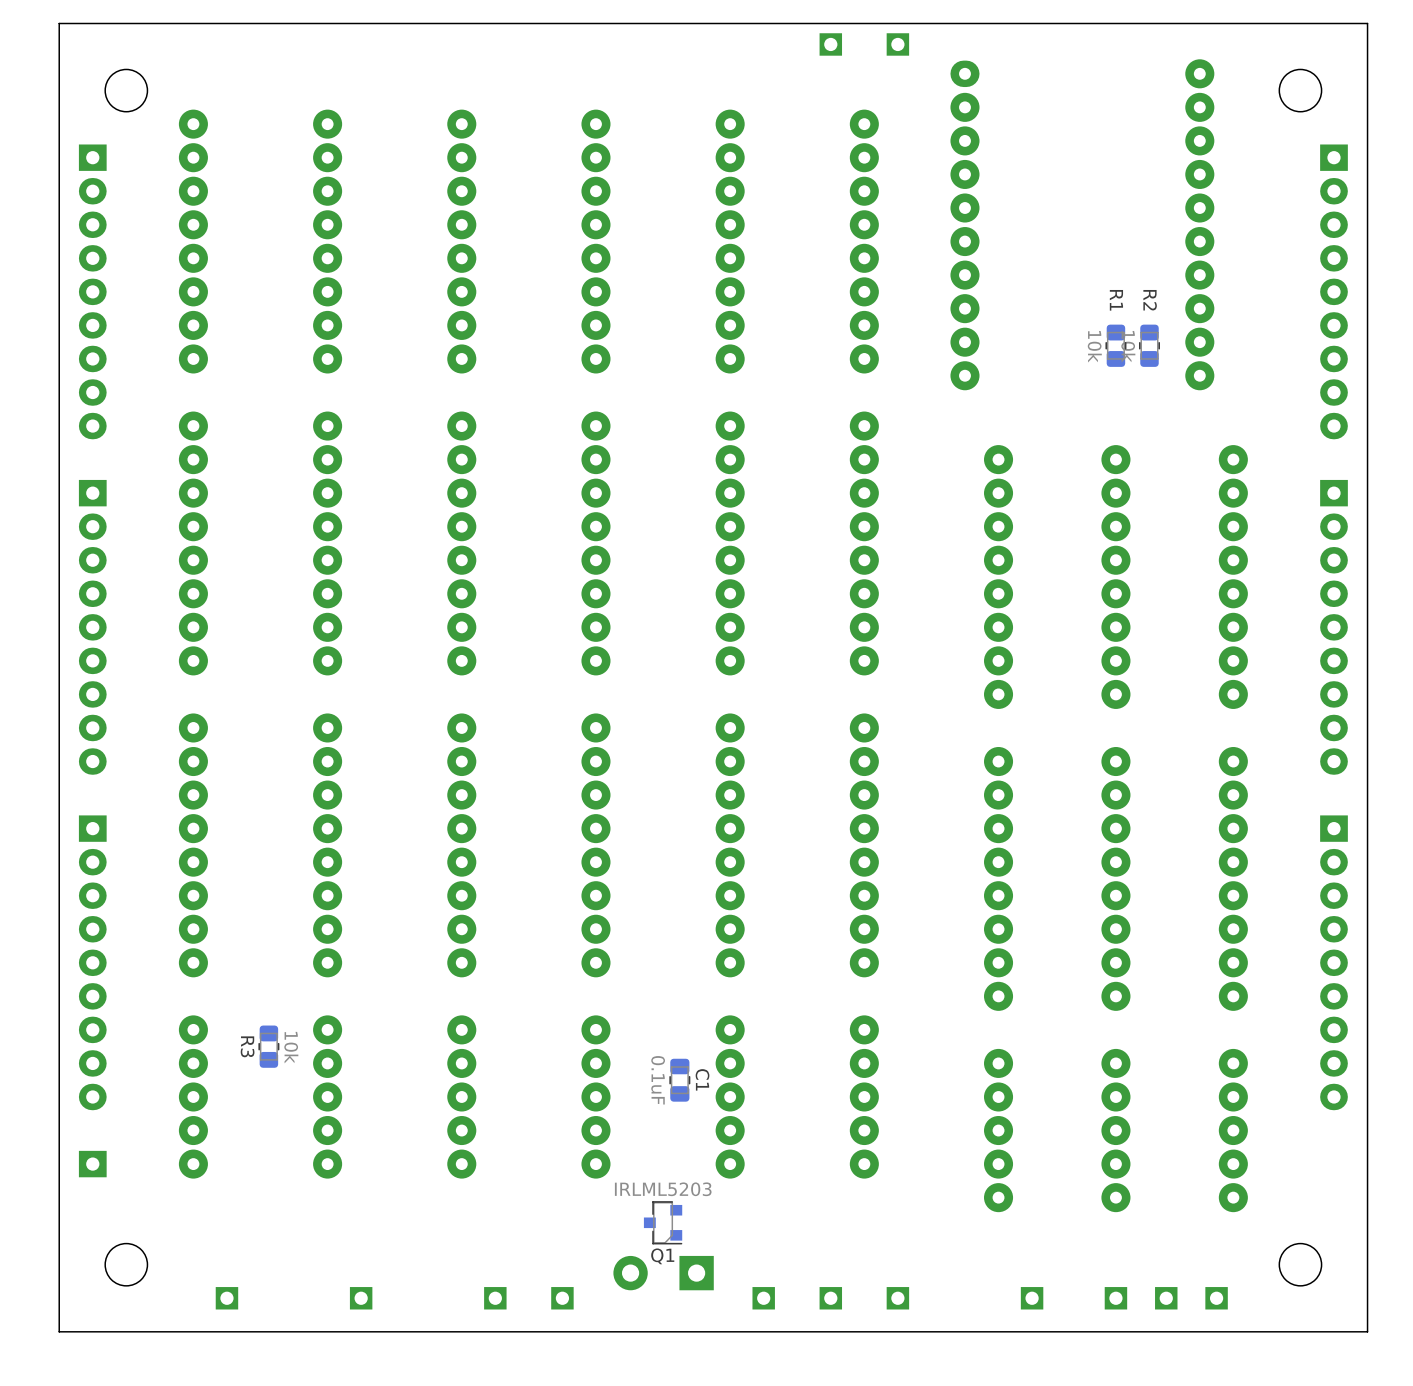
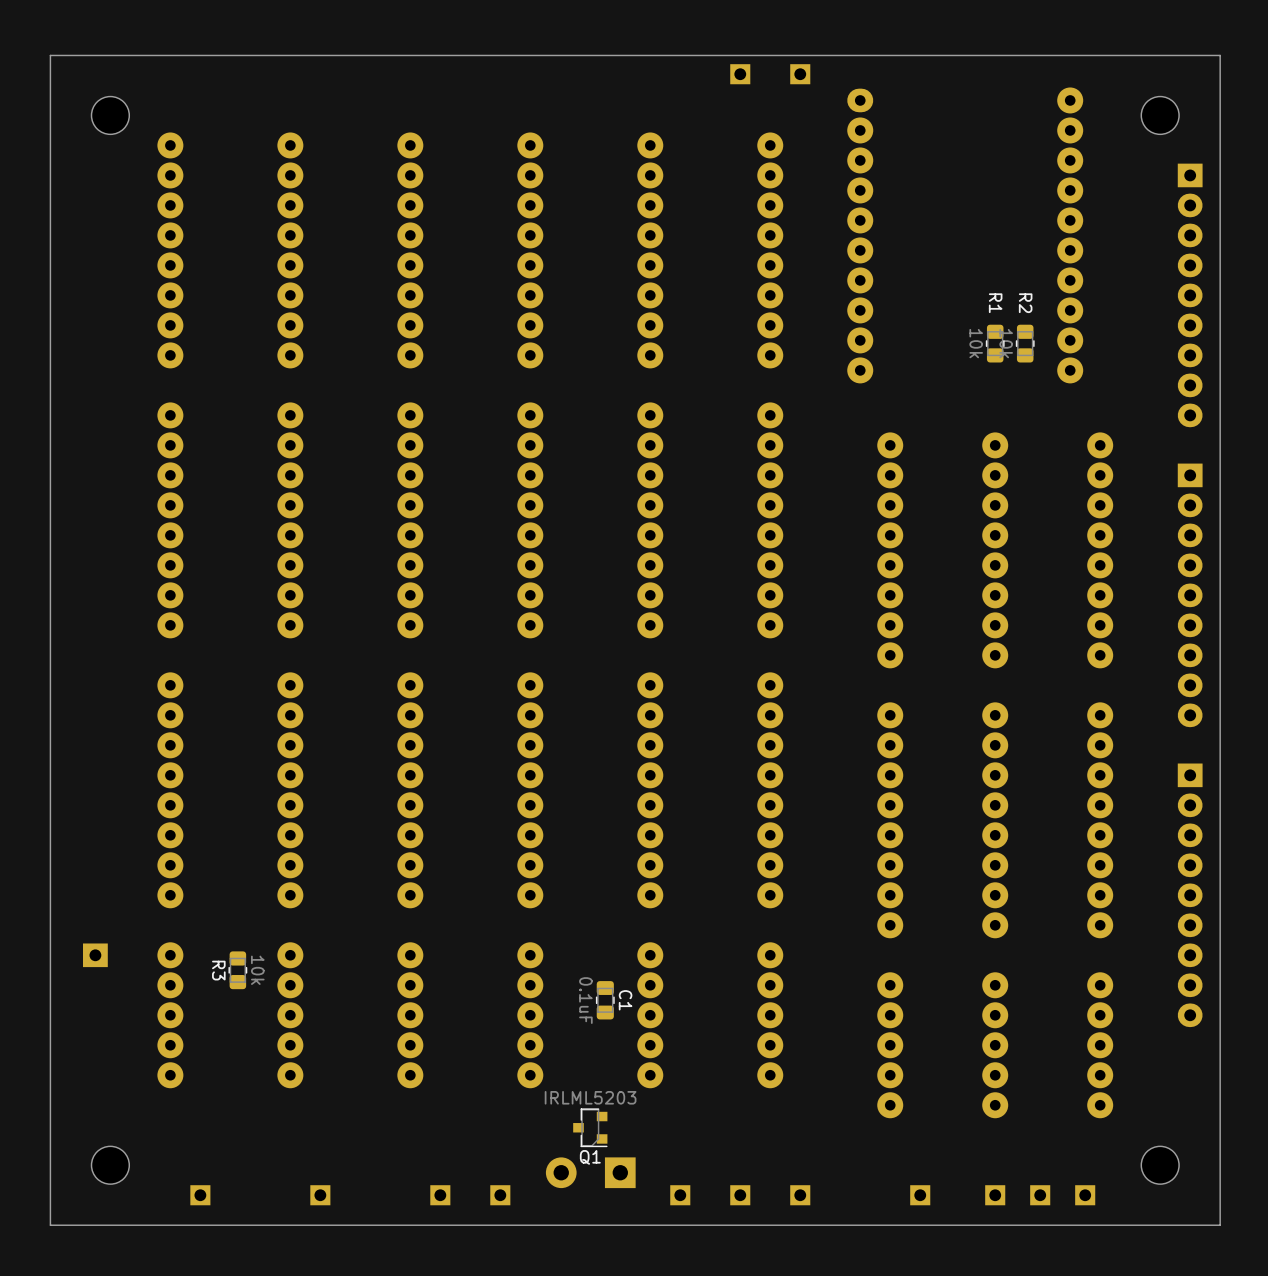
part: (92, 291) -> none
part: (92, 627) -> none
part: (92, 962) -> none
part position: (92, 1164) -> (95, 955)

